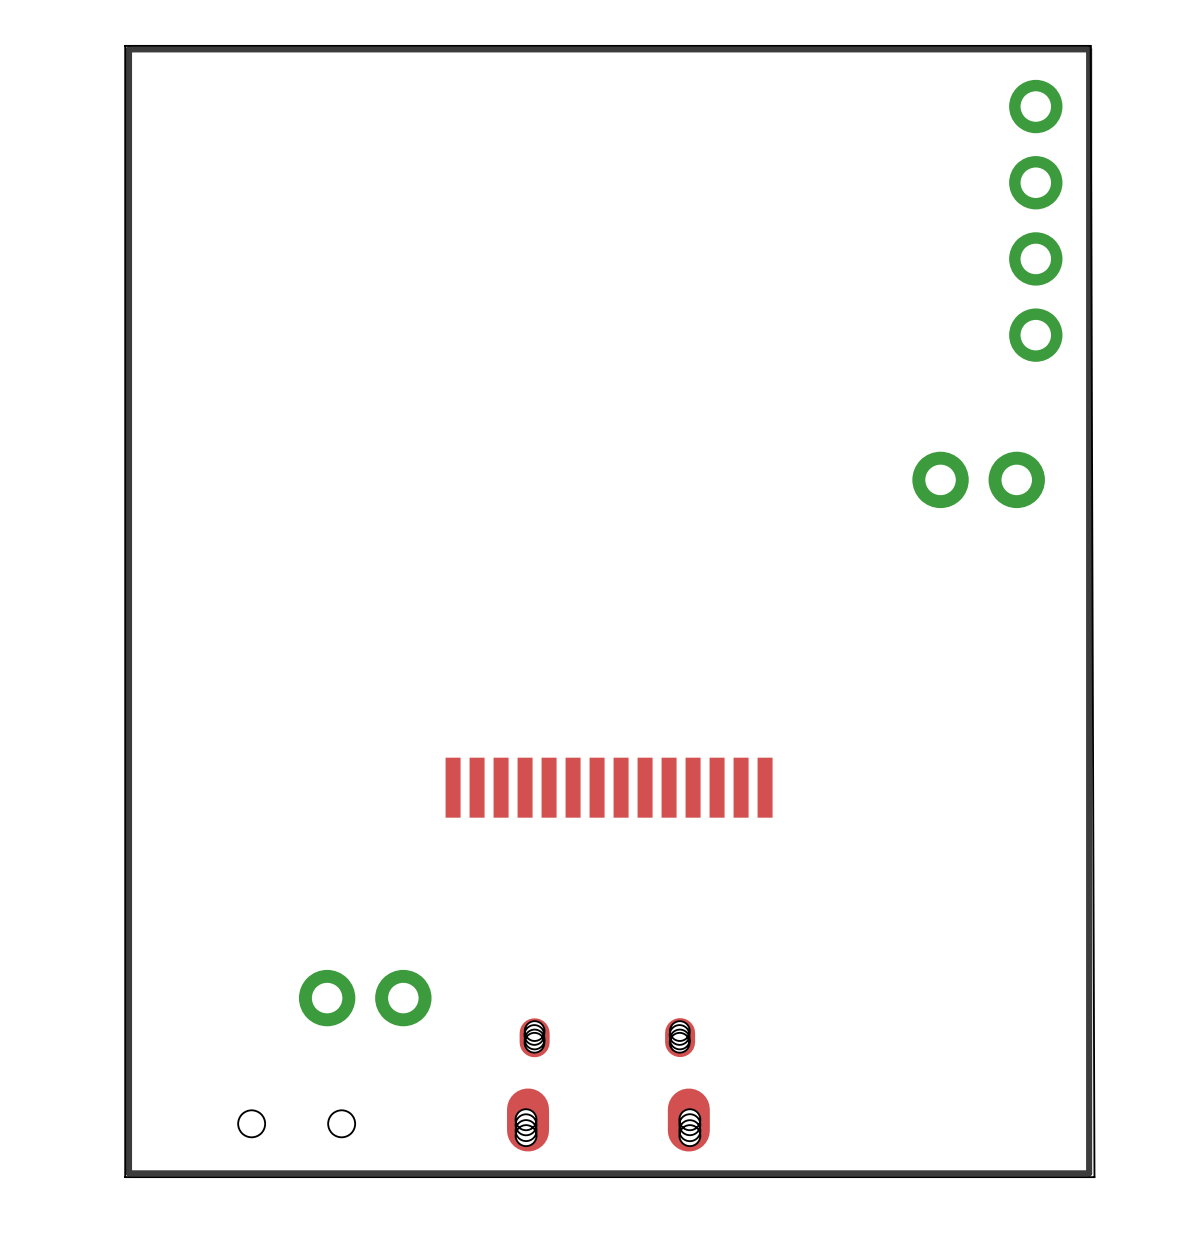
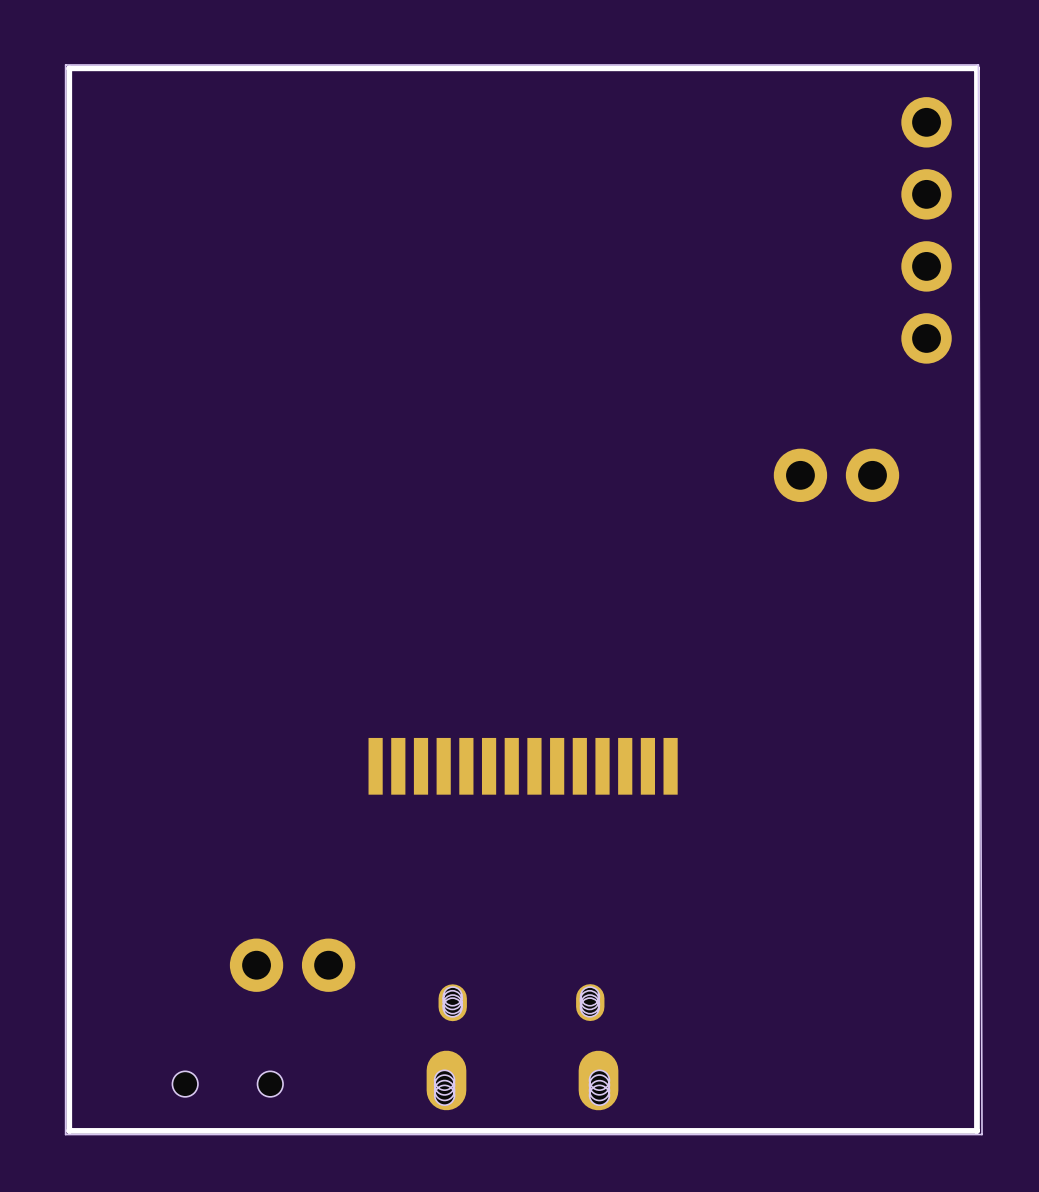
part position: (978, 479) -> (836, 475)

